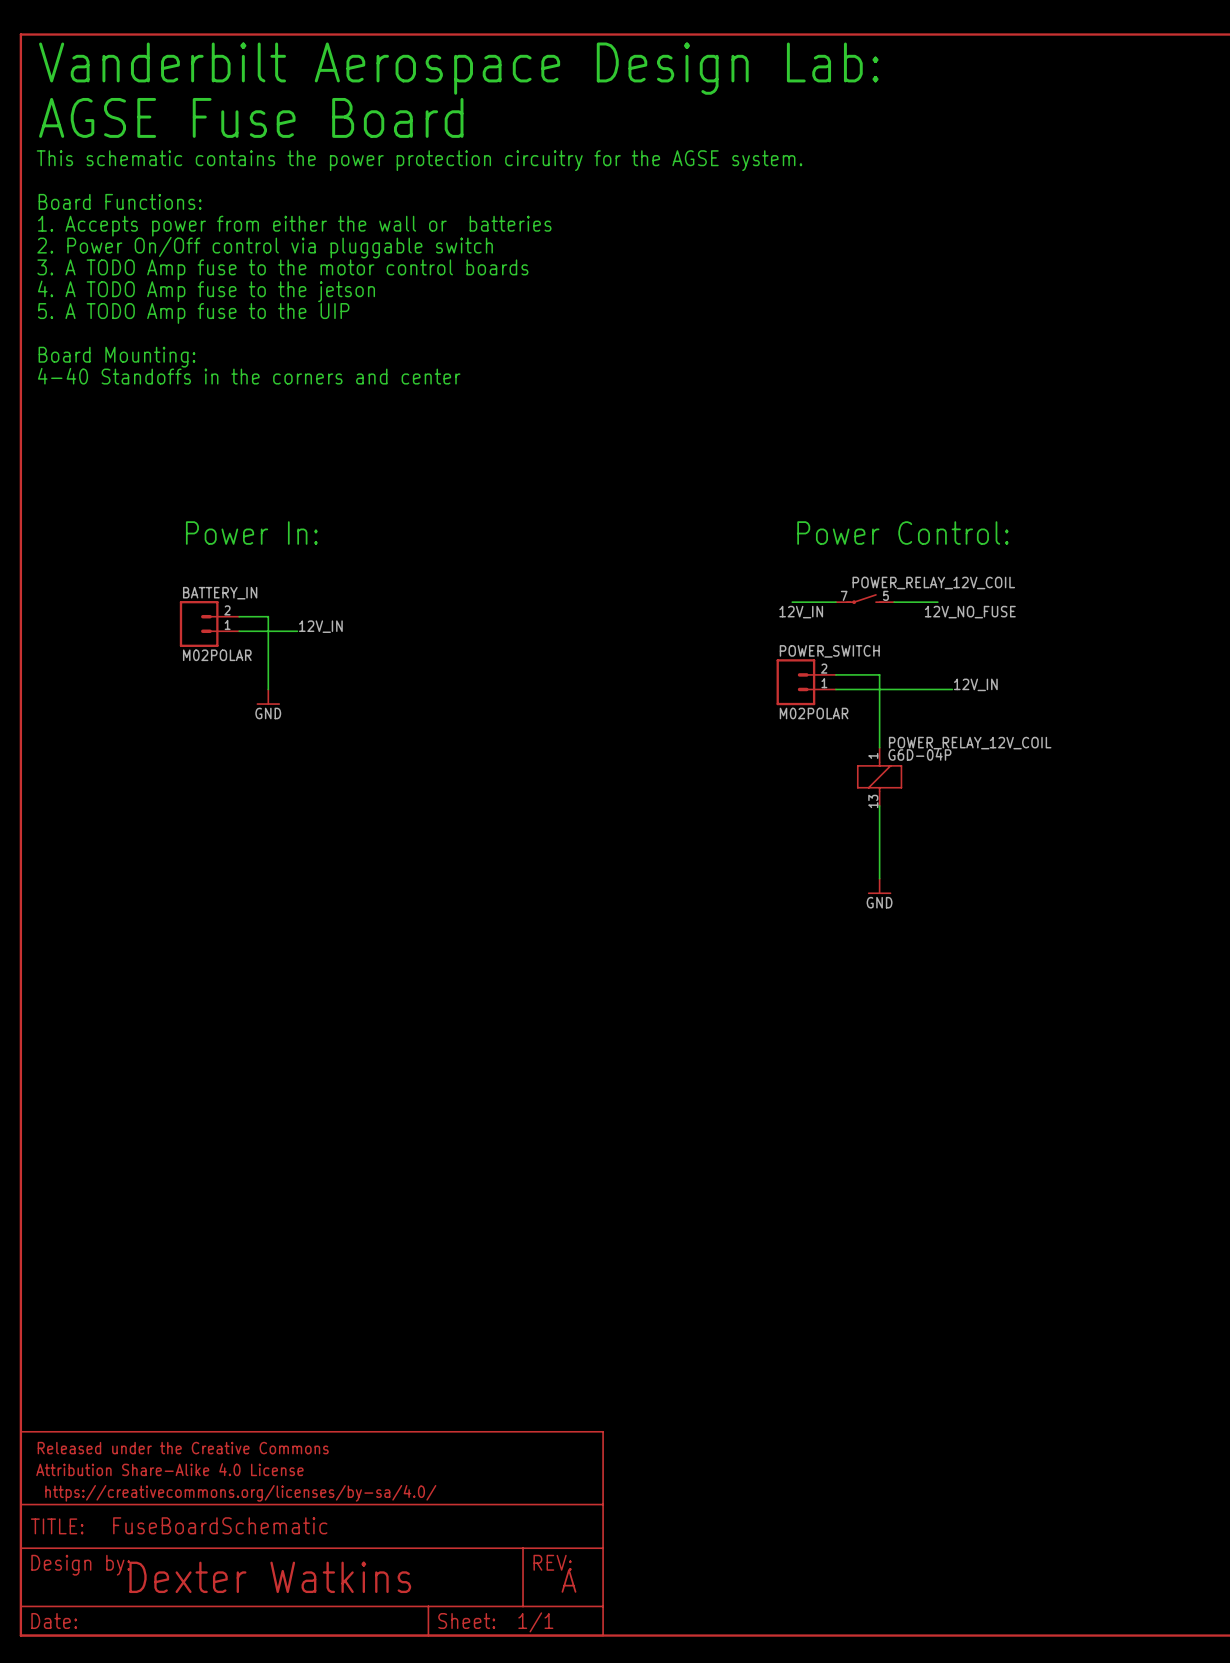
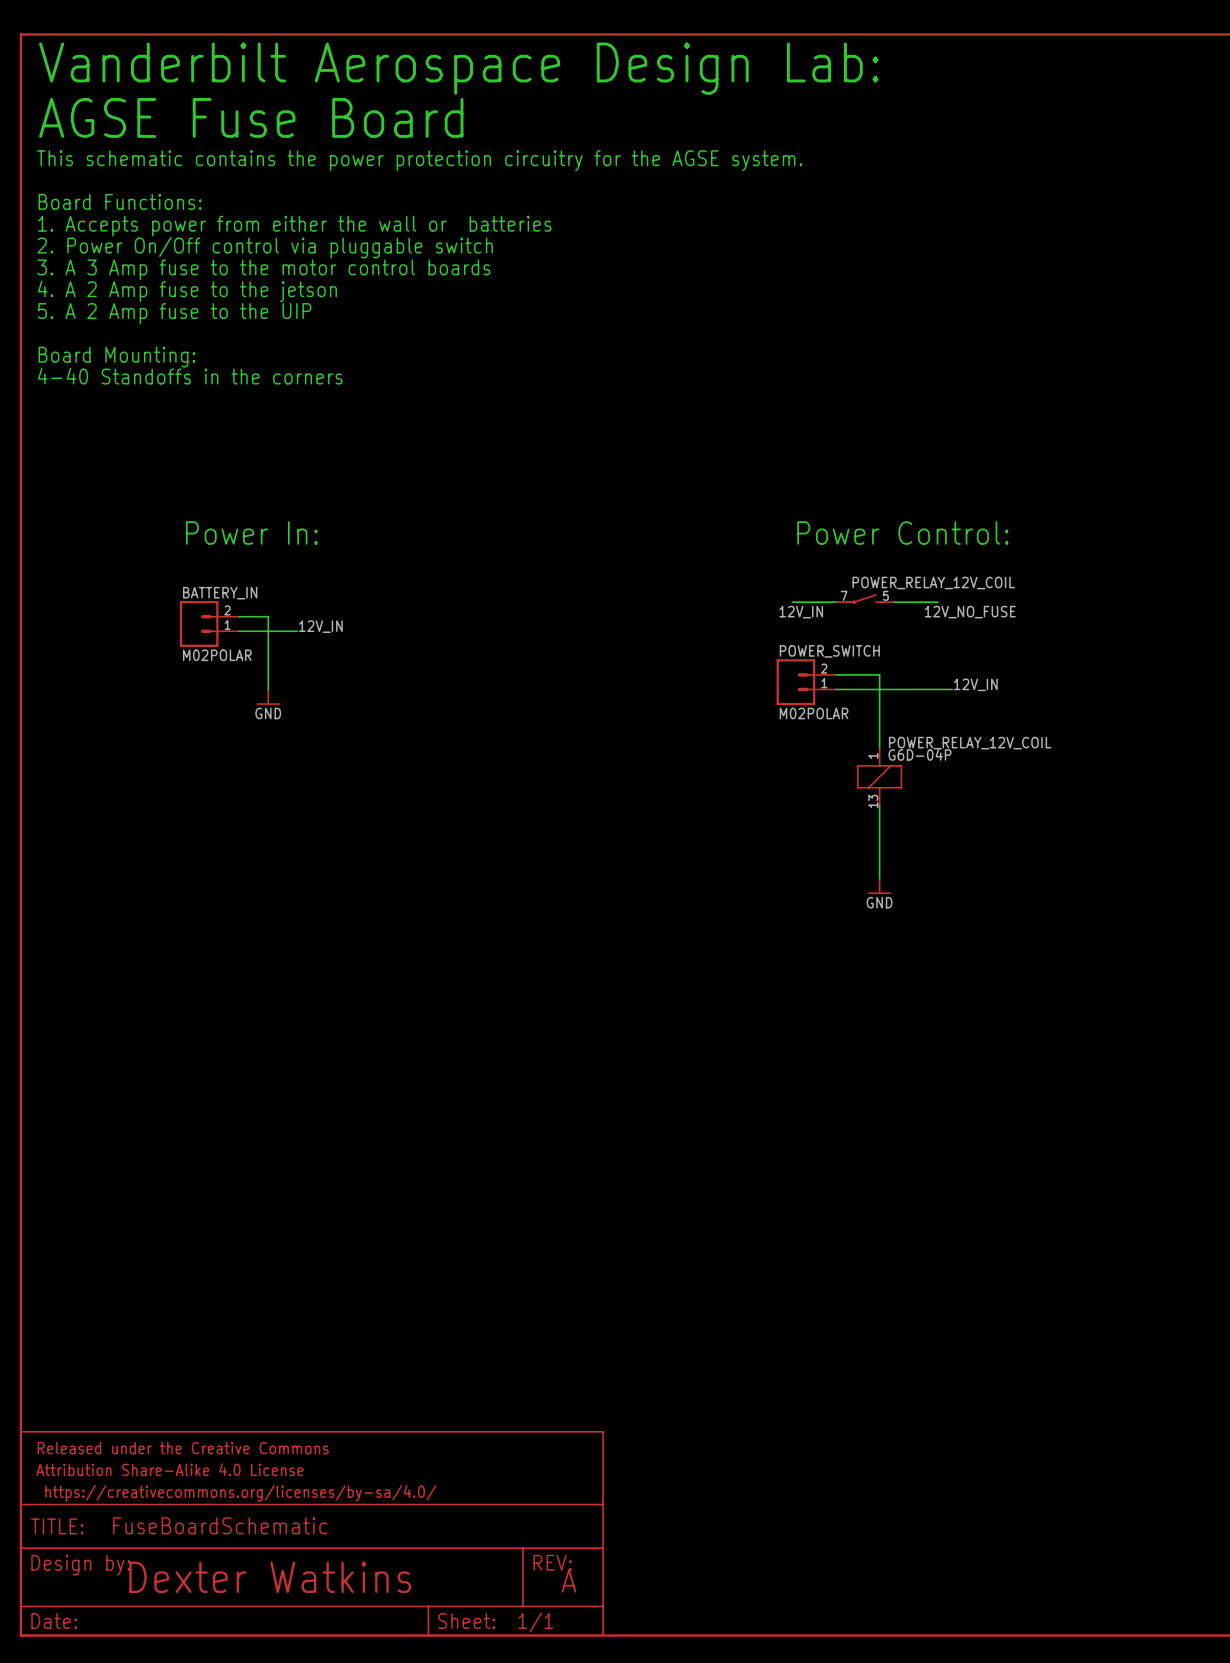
text: 3. A TODO Amp fuse to the motor control boards (282, 269) -> 3. A 3 Amp fuse to the motor control boards (263, 269)
text: 4. A TODO Amp fuse to the jetson (206, 291) -> 4. A 2 Amp fuse to the jetson (187, 291)
text: 5. A TODO Amp fuse to the UIP (193, 313) -> 5. A 2 Amp fuse to the UIP (174, 313)
text: 4-40 Standoffs in the corners and center (249, 376) -> 4-40 Standoffs in the corners (190, 376)

